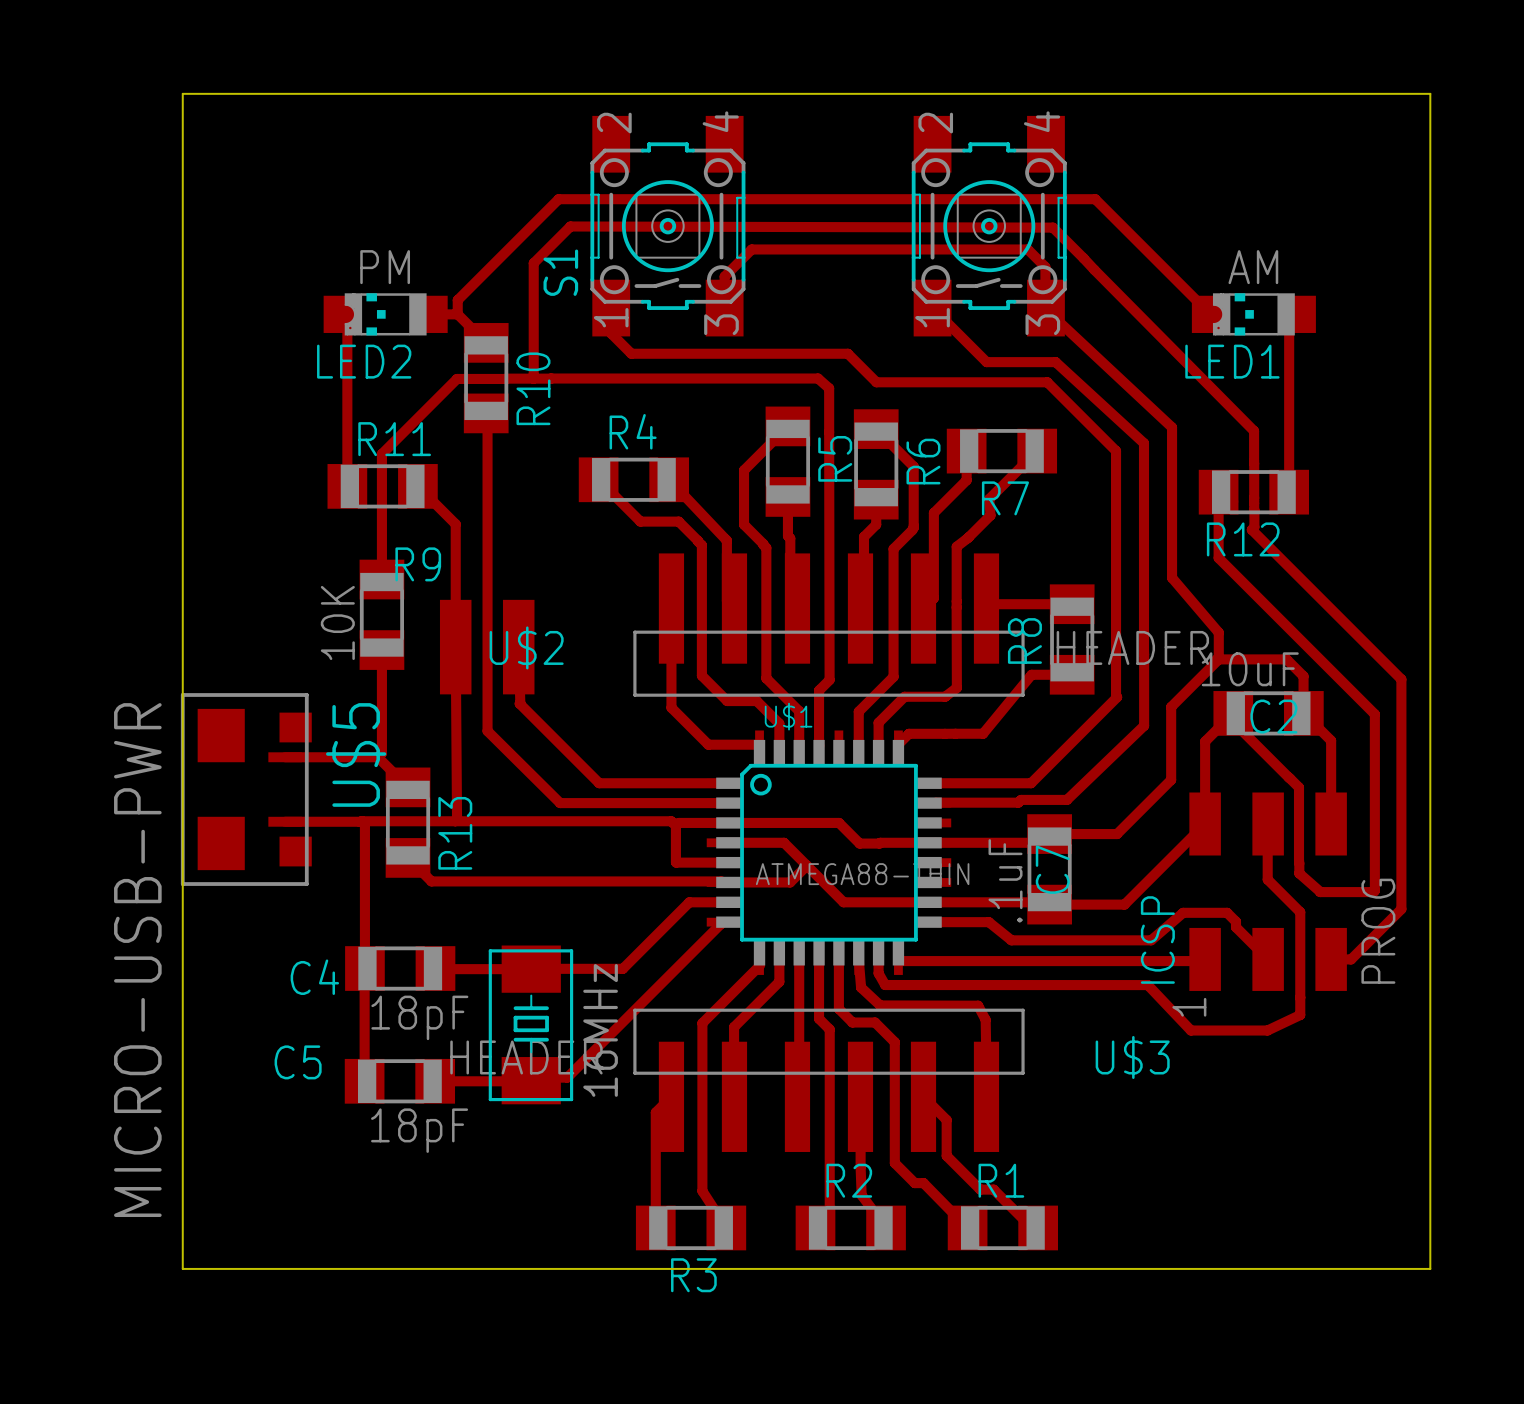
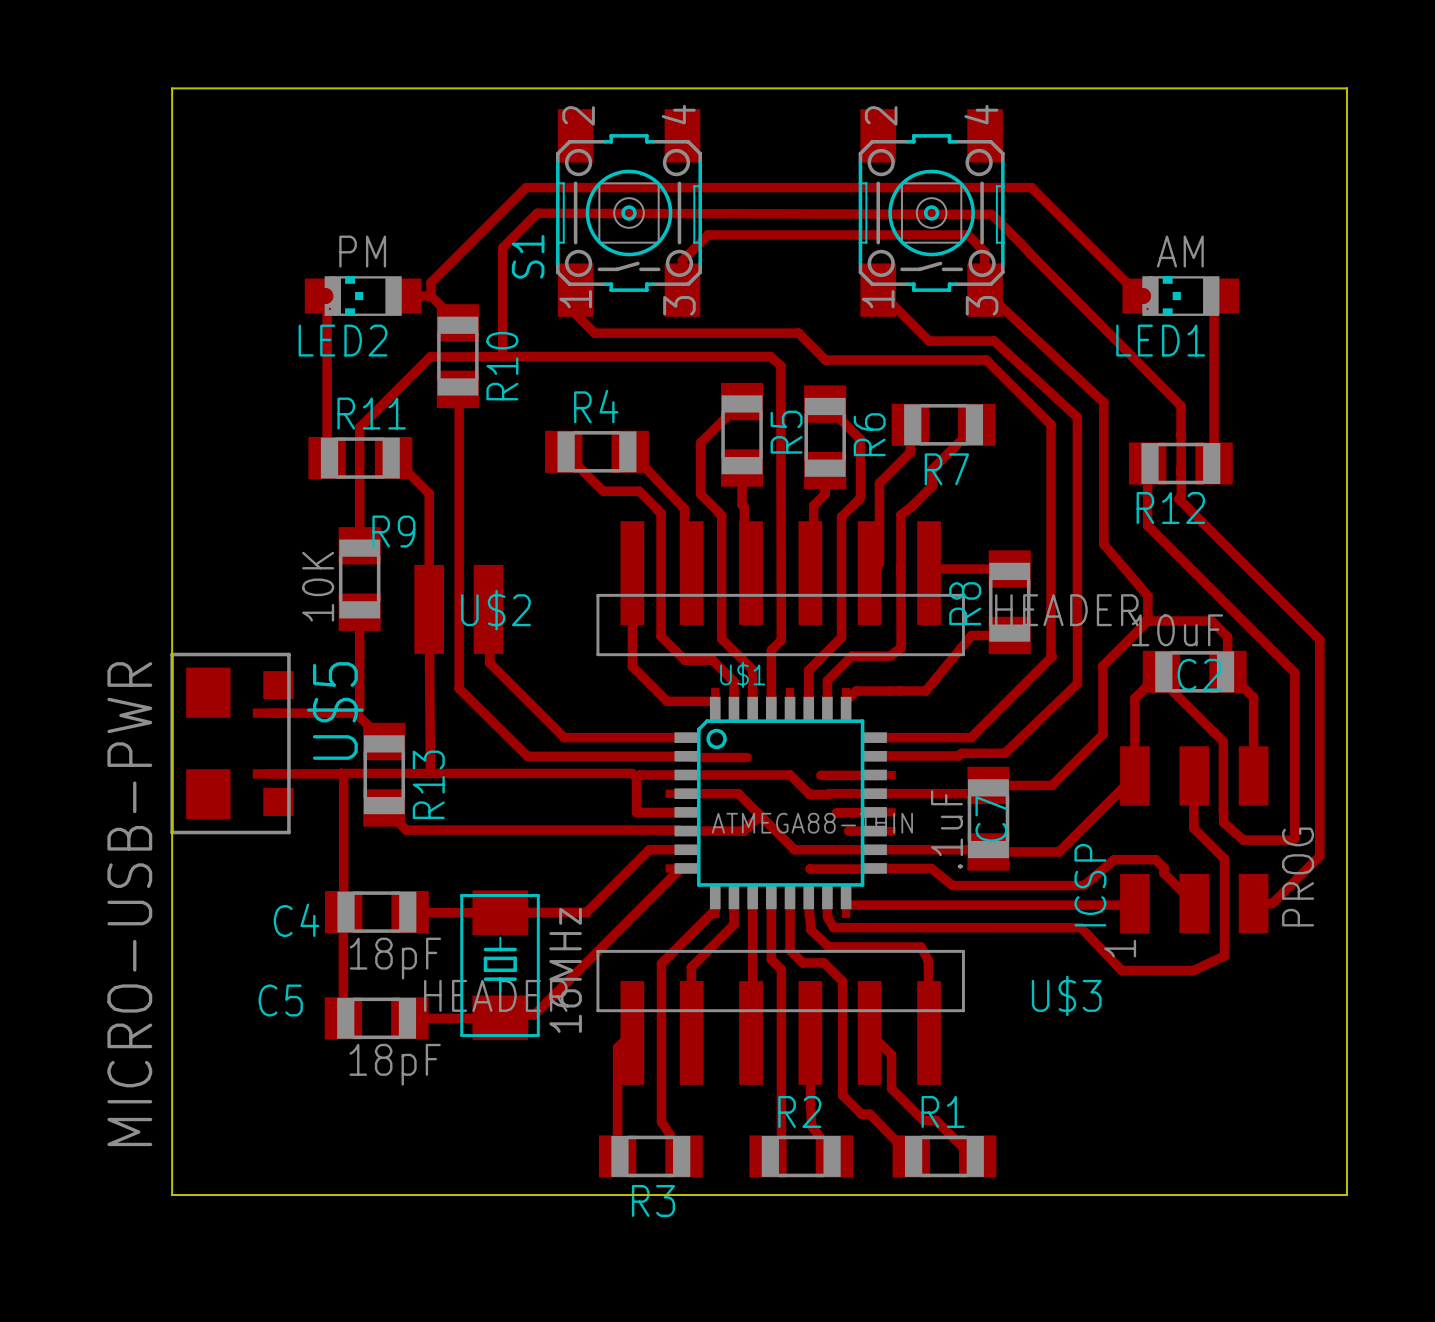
track: none -> (692, 757) (747, 757)
track: none -> (820, 775) (878, 775)
track: none -> (836, 812) (878, 812)
track: none -> (848, 831) (877, 831)
track: none -> (810, 868) (877, 869)

